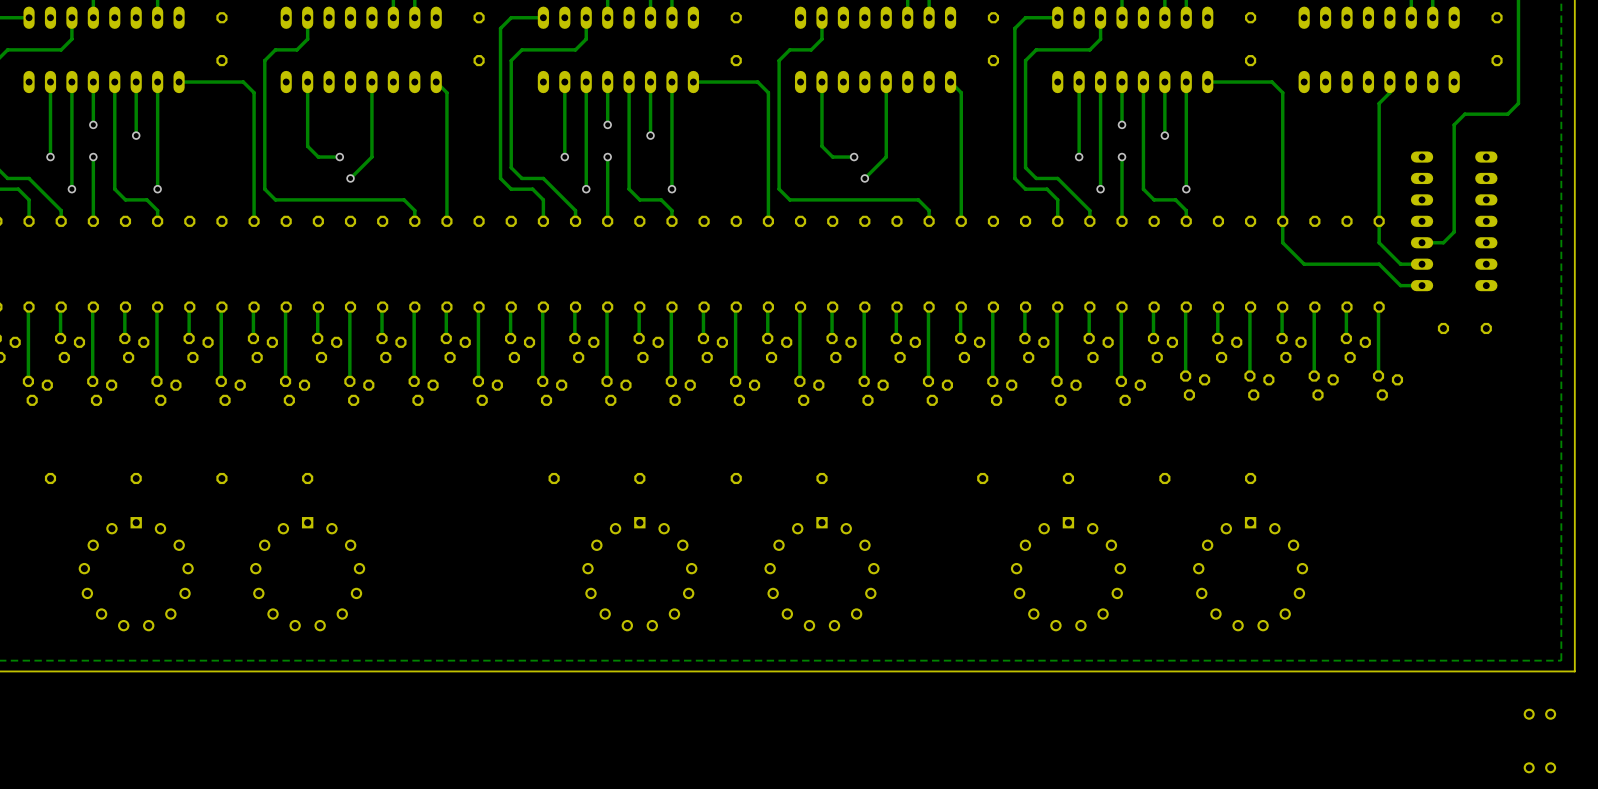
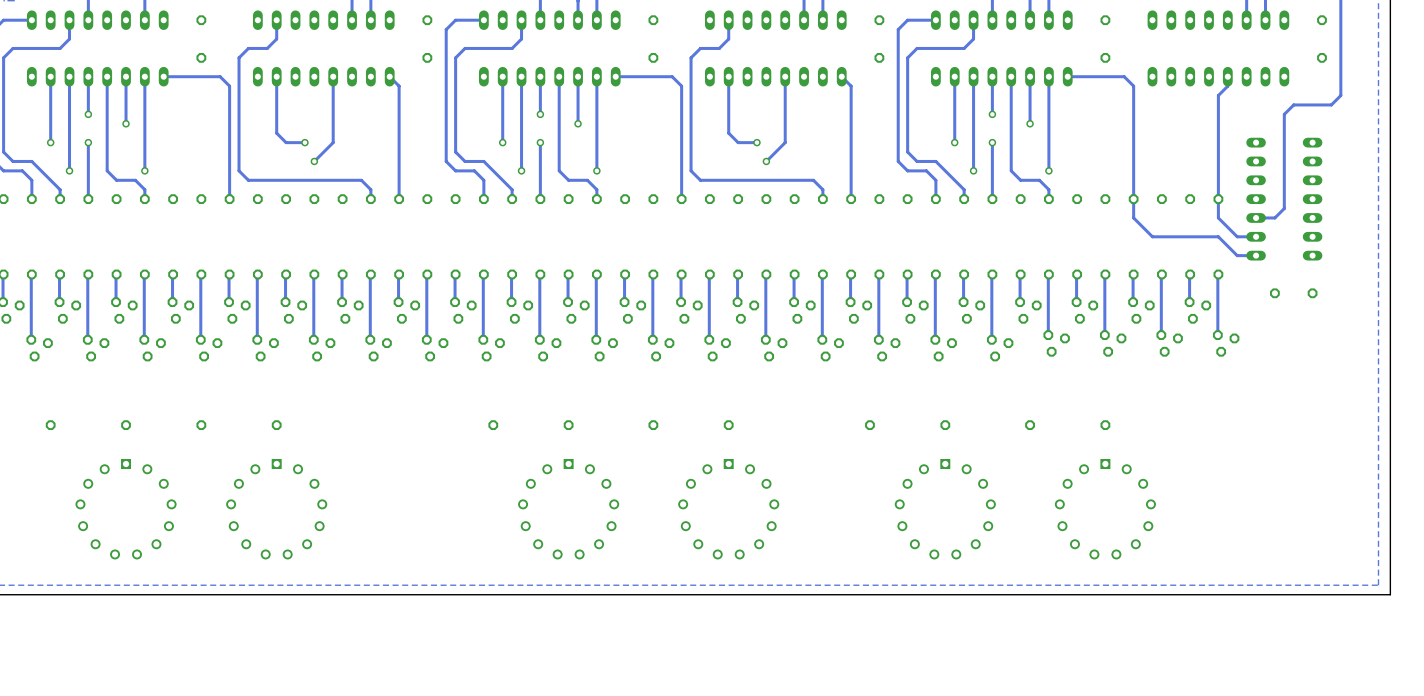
part: (1539, 714) -> none
part: (1539, 767) -> none

